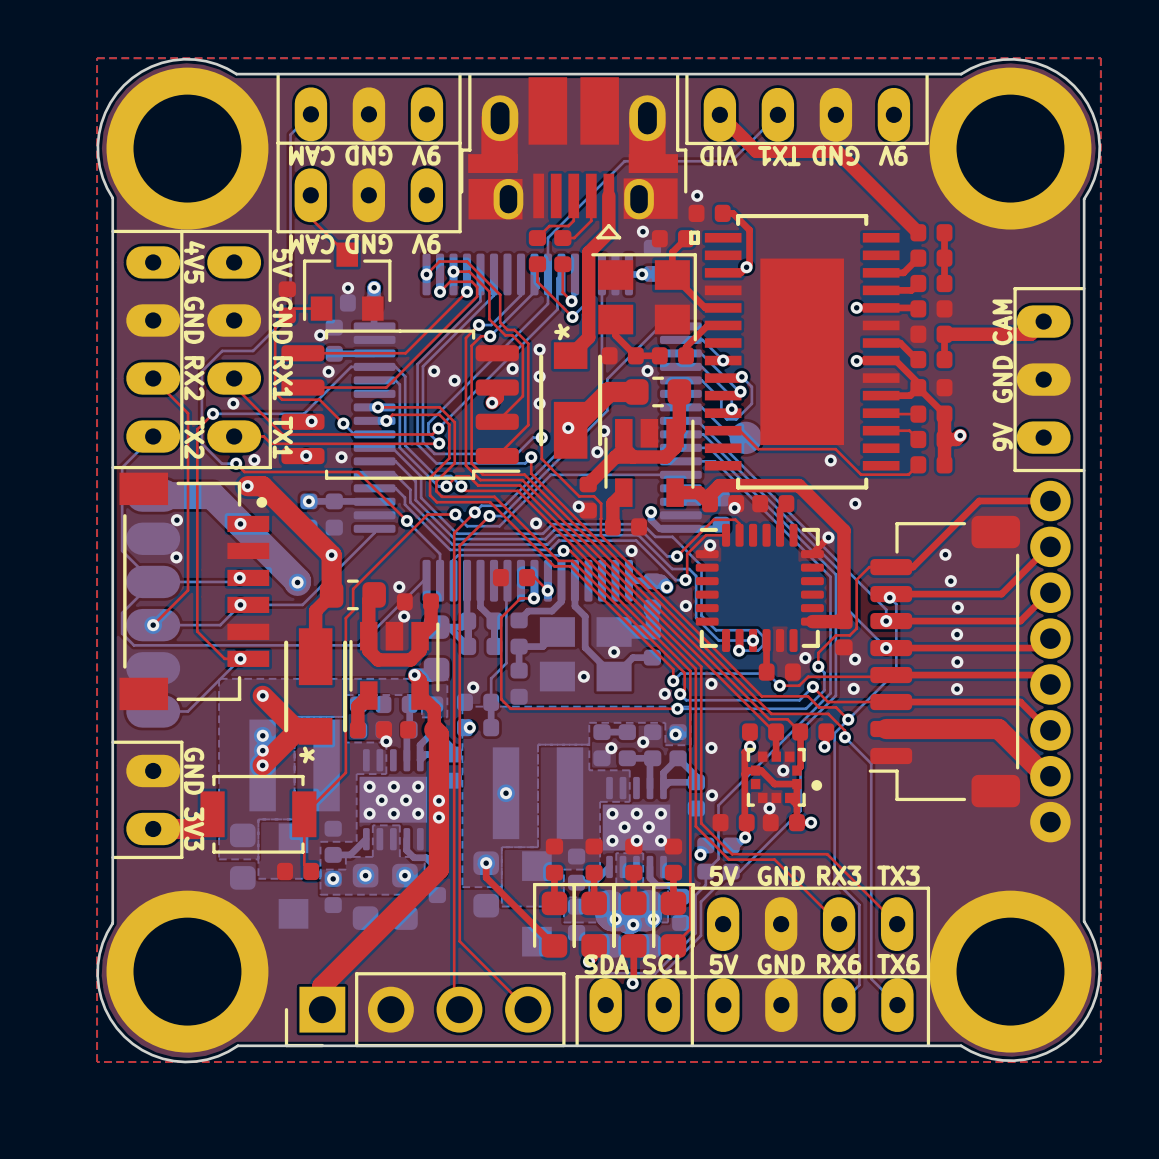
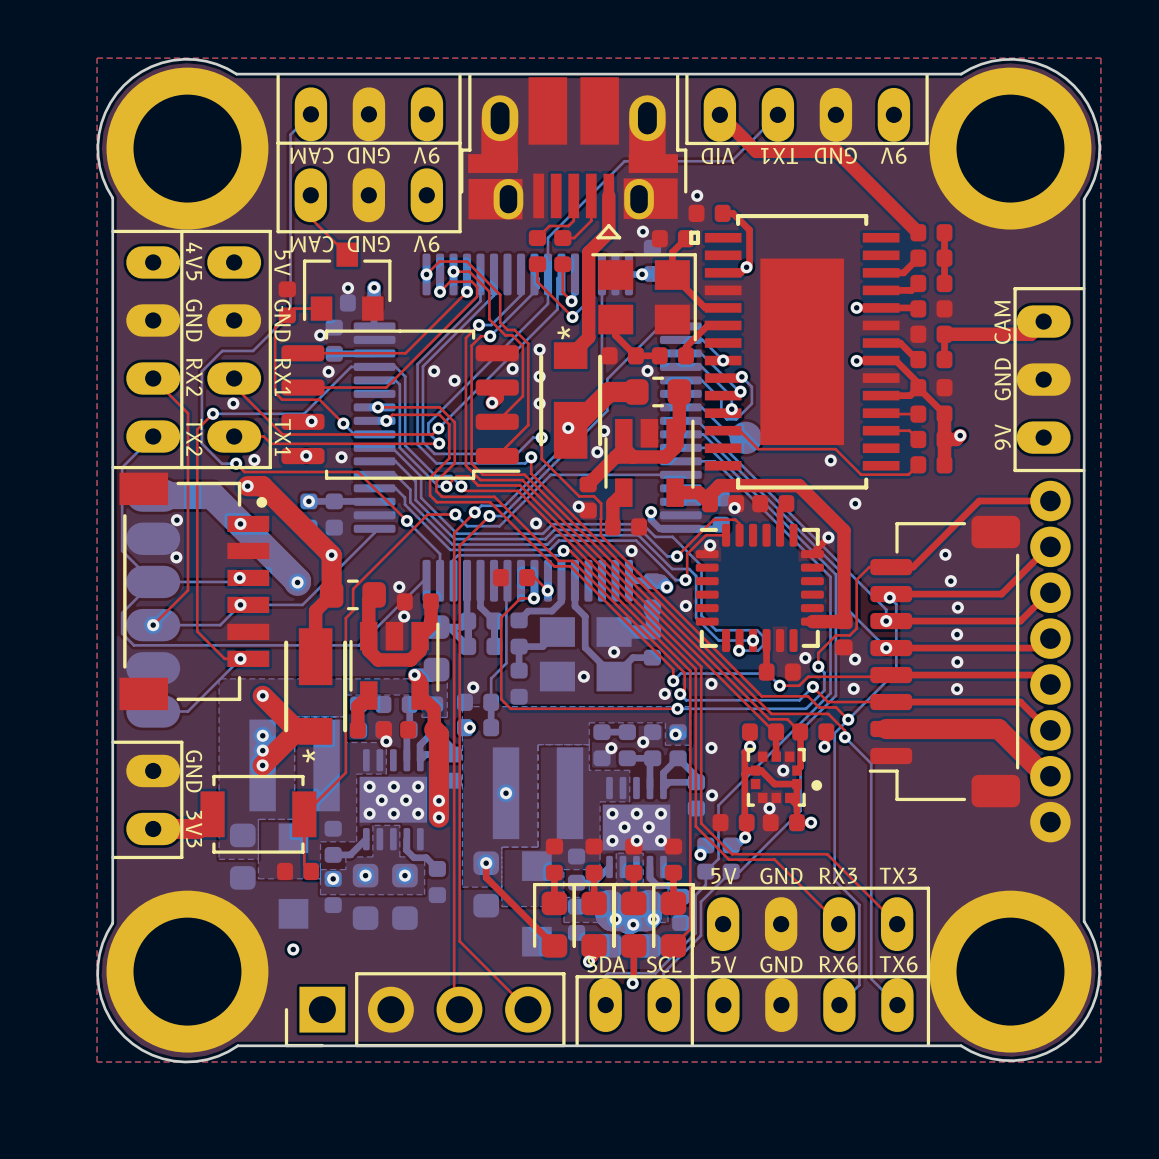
top track: (438, 817) (438, 869) (322, 986) (322, 1009) -> none
via: none -> (293, 949)

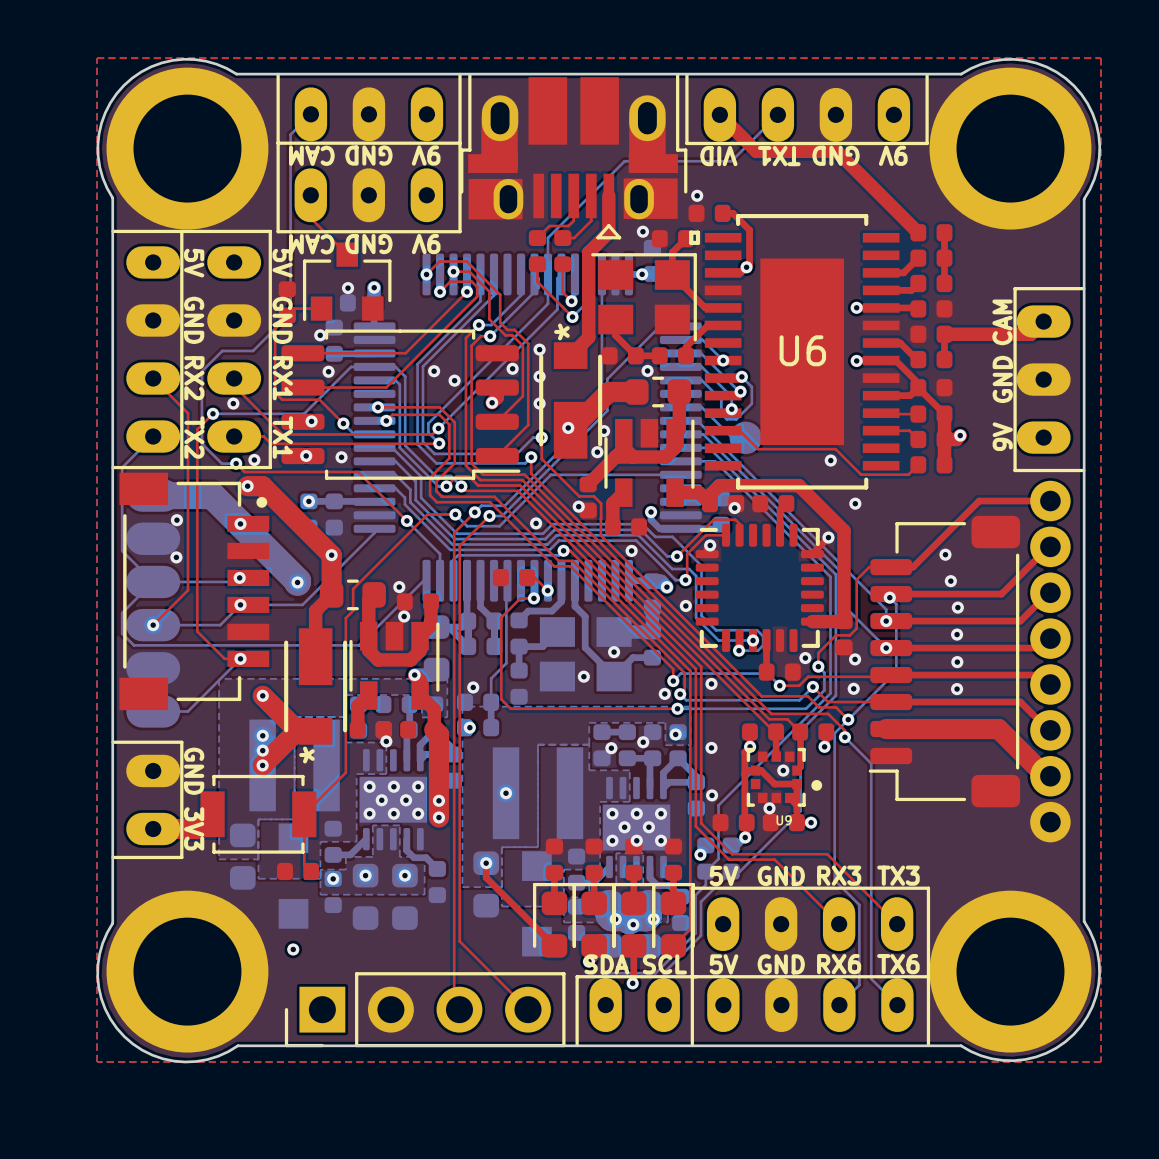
text: 4V5 (194, 261) -> 5V (194, 263)
U6 name: none -> U6 (802, 350)
U9 name: none -> U9 (784, 820)

